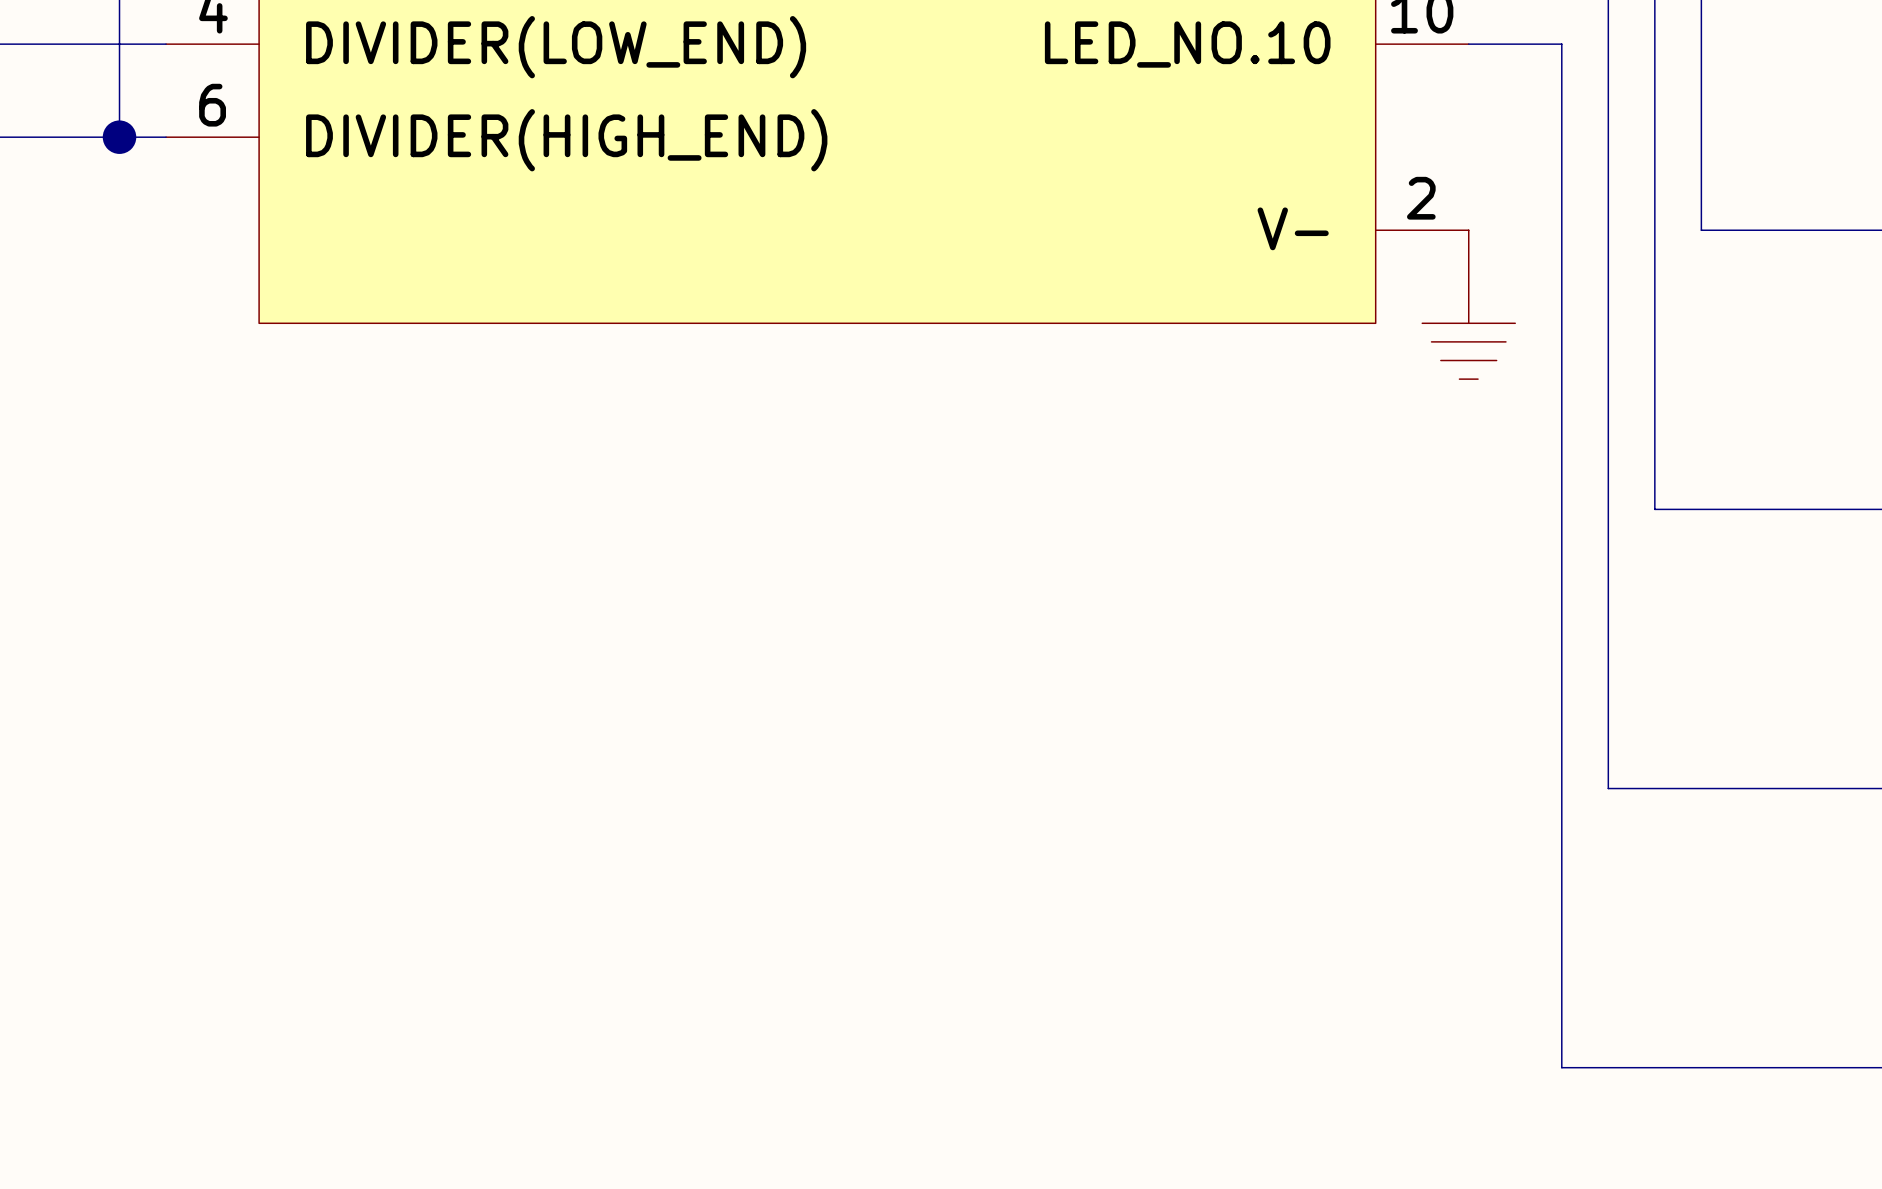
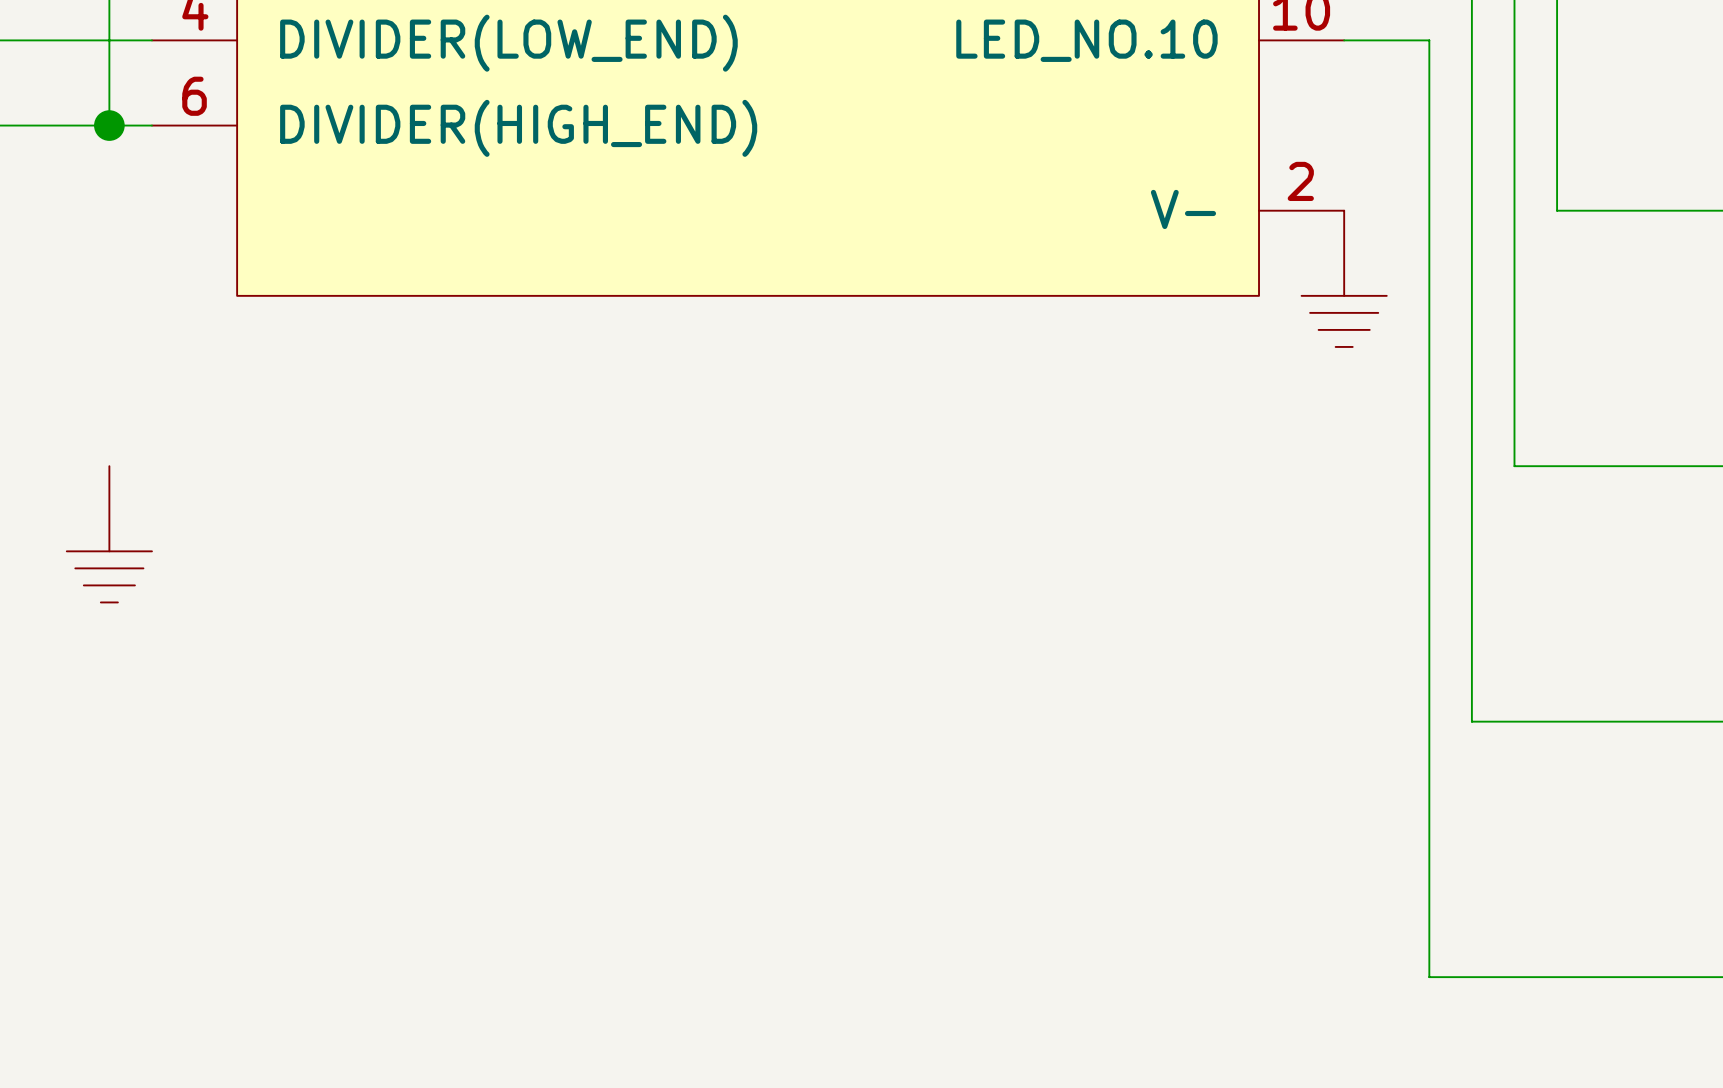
power symbol: none -> (109, 534)

